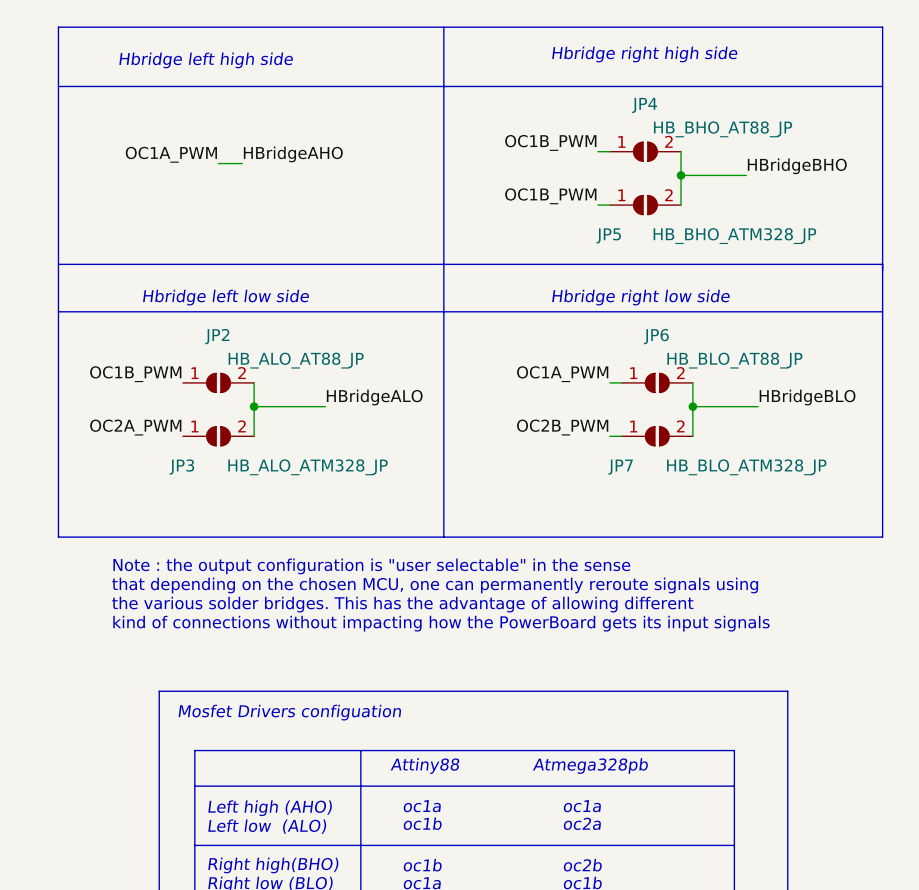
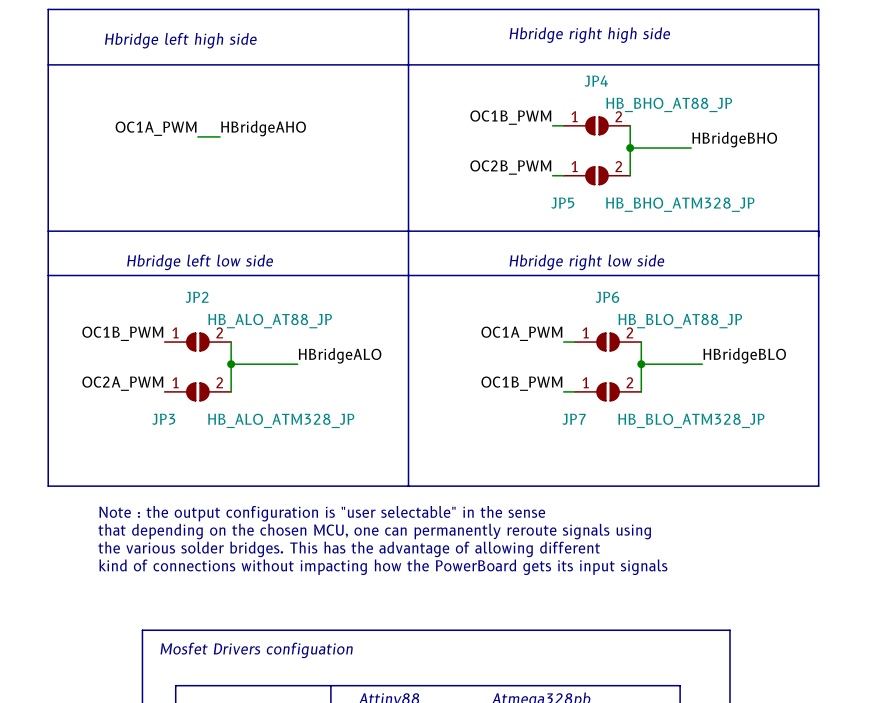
label: OC1B_PWM (550, 196) -> OC2B_PWM (510, 167)
label: OC2B_PWM (562, 427) -> OC1B_PWM (521, 383)

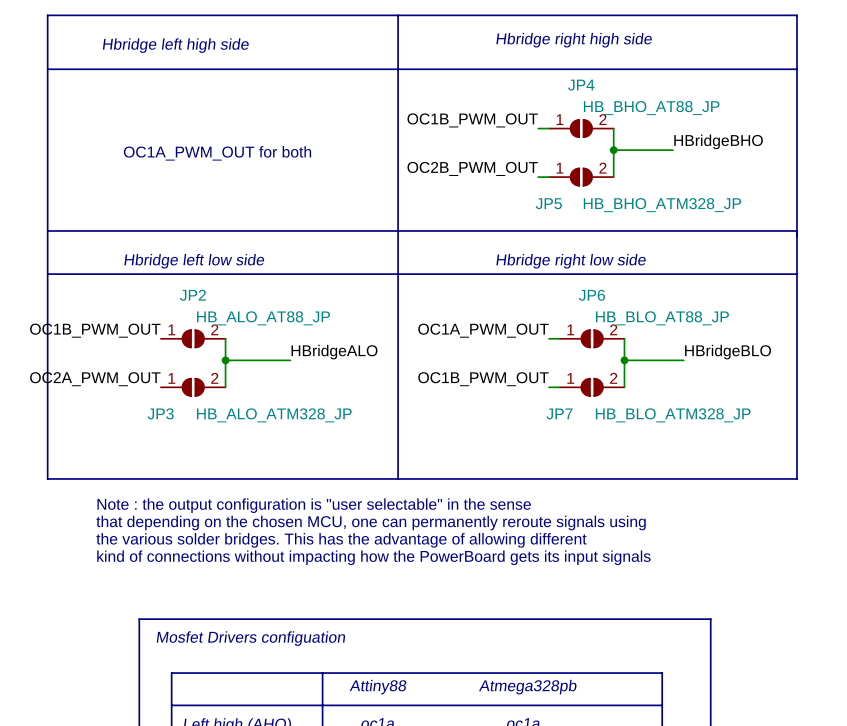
label: OC1B_PWM (510, 117) -> OC1B_PWM_OUT (472, 120)
label: OC1A_PWM (156, 128) -> none
label: HBridgeAHO (263, 128) -> none
wire: (197, 136) (220, 136) -> none
text: none -> OC1A_PWM_OUT for both (217, 153)
label: OC2B_PWM (510, 167) -> OC2B_PWM_OUT (472, 168)
label: OC1B_PWM (122, 333) -> OC1B_PWM_OUT (95, 330)
label: OC1A_PWM (521, 333) -> OC1A_PWM_OUT (483, 330)
label: OC2A_PWM (122, 383) -> OC2A_PWM_OUT (95, 379)
label: OC1B_PWM (521, 383) -> OC1B_PWM_OUT (483, 379)

